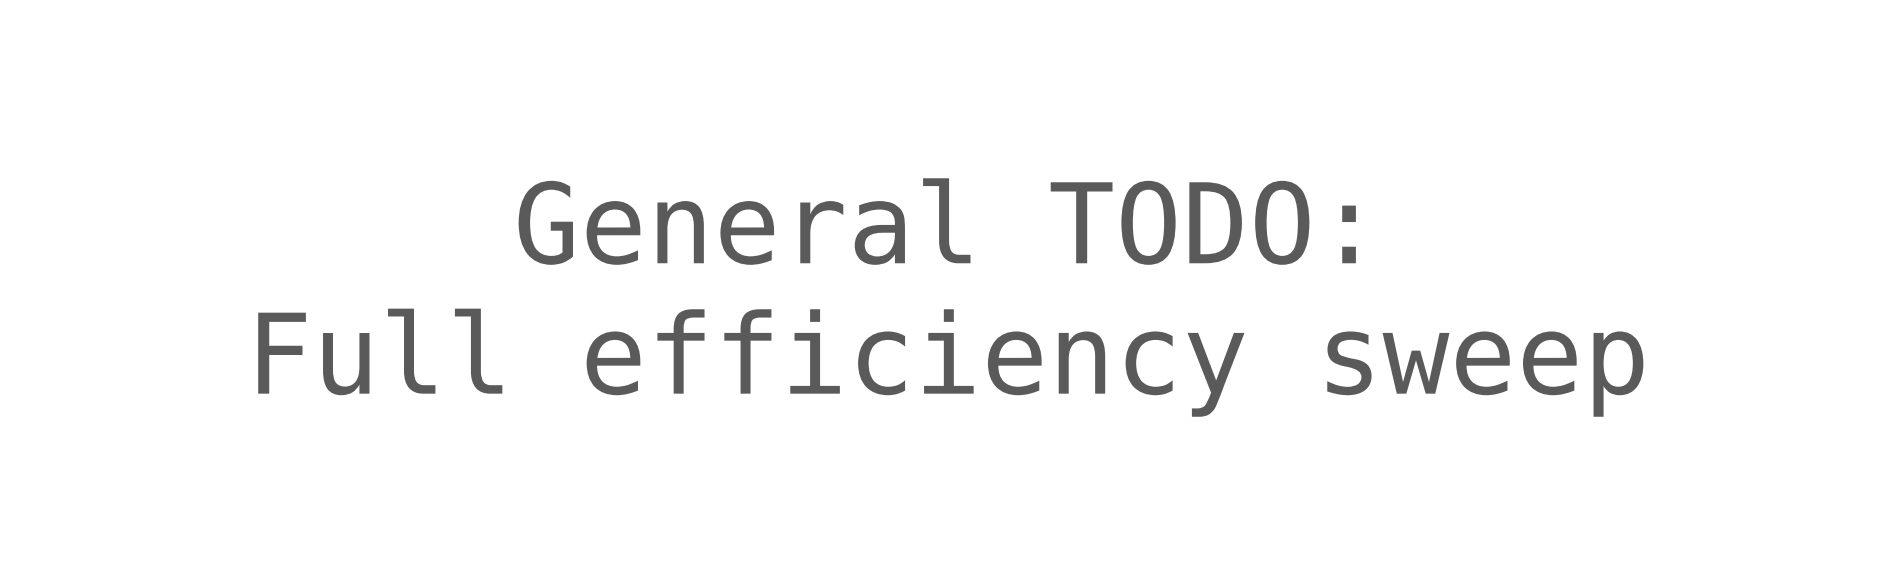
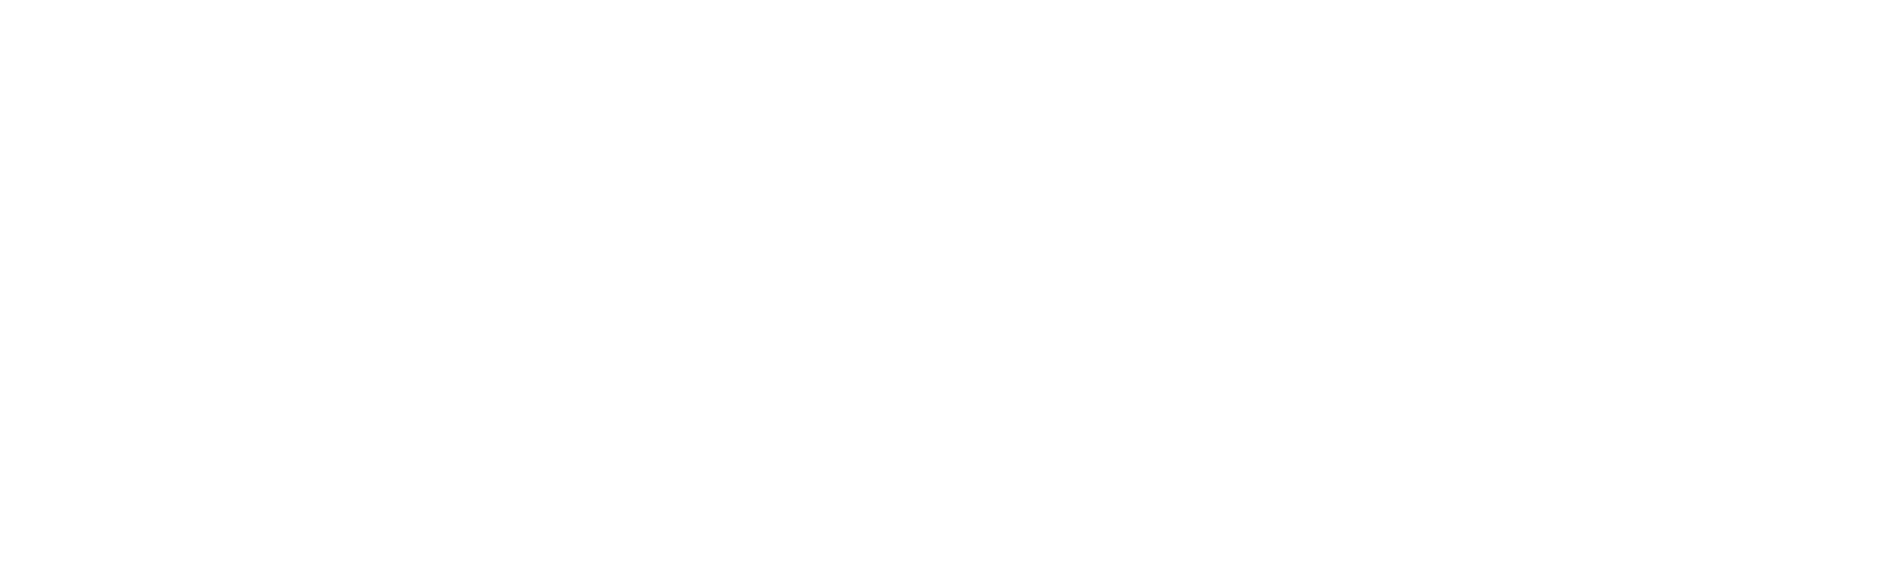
text: General TODO: (937, 221) -> none
text: Full efficiency sweep (950, 362) -> none

